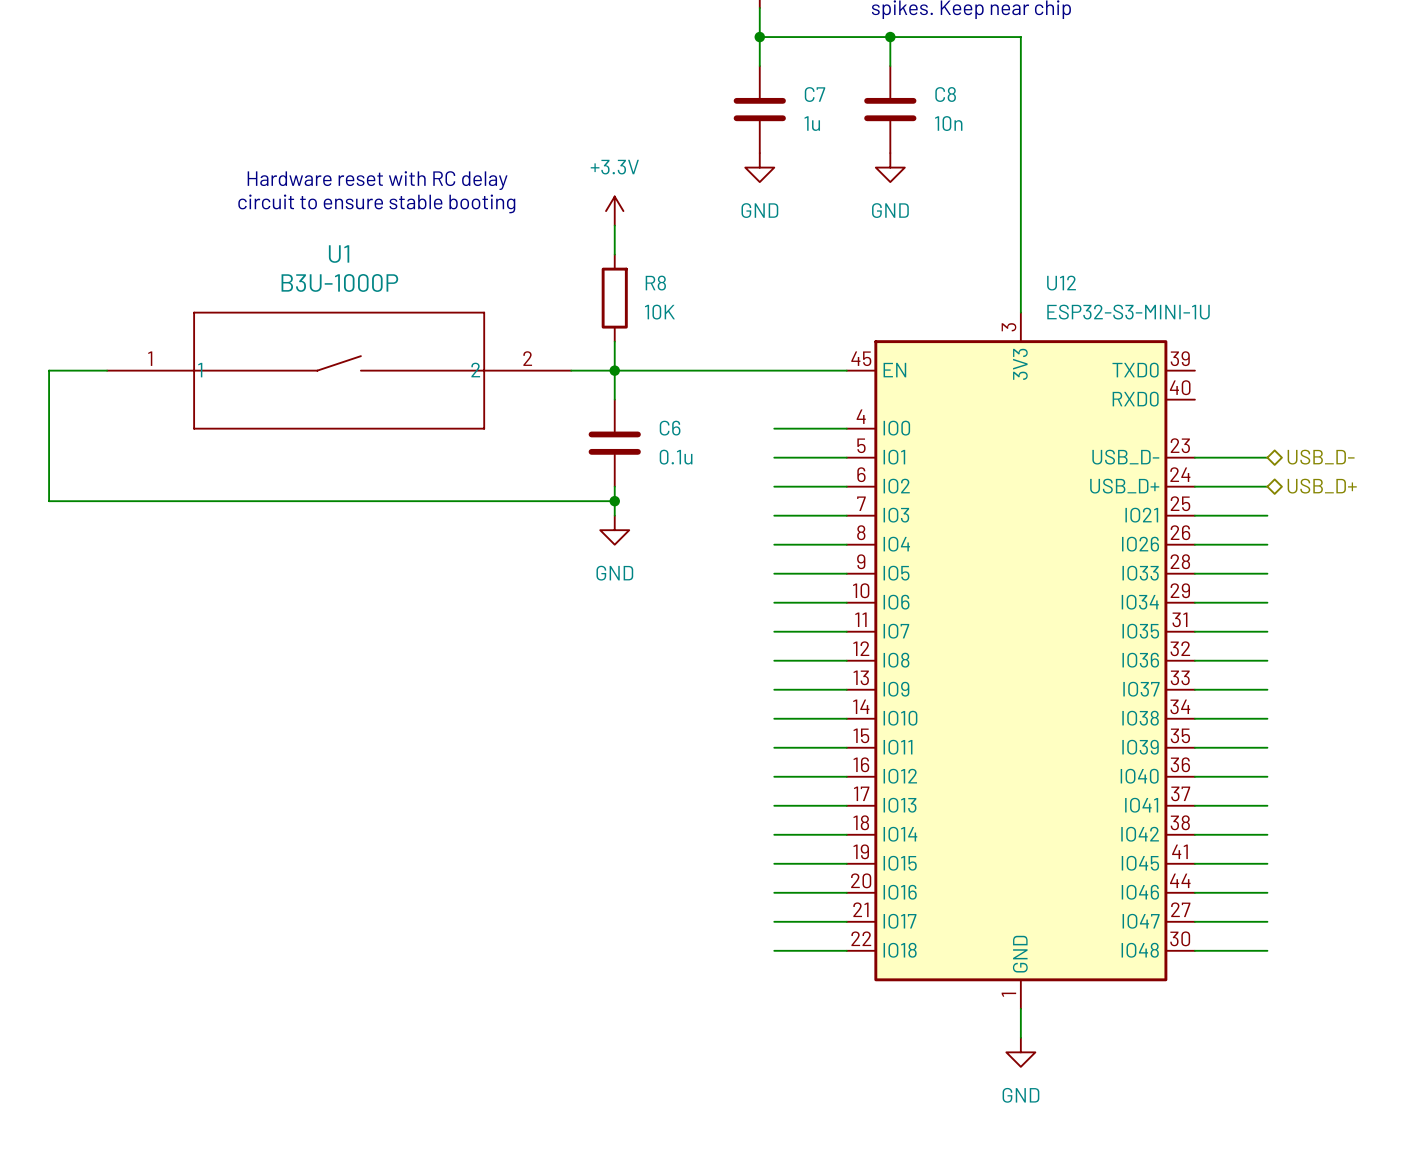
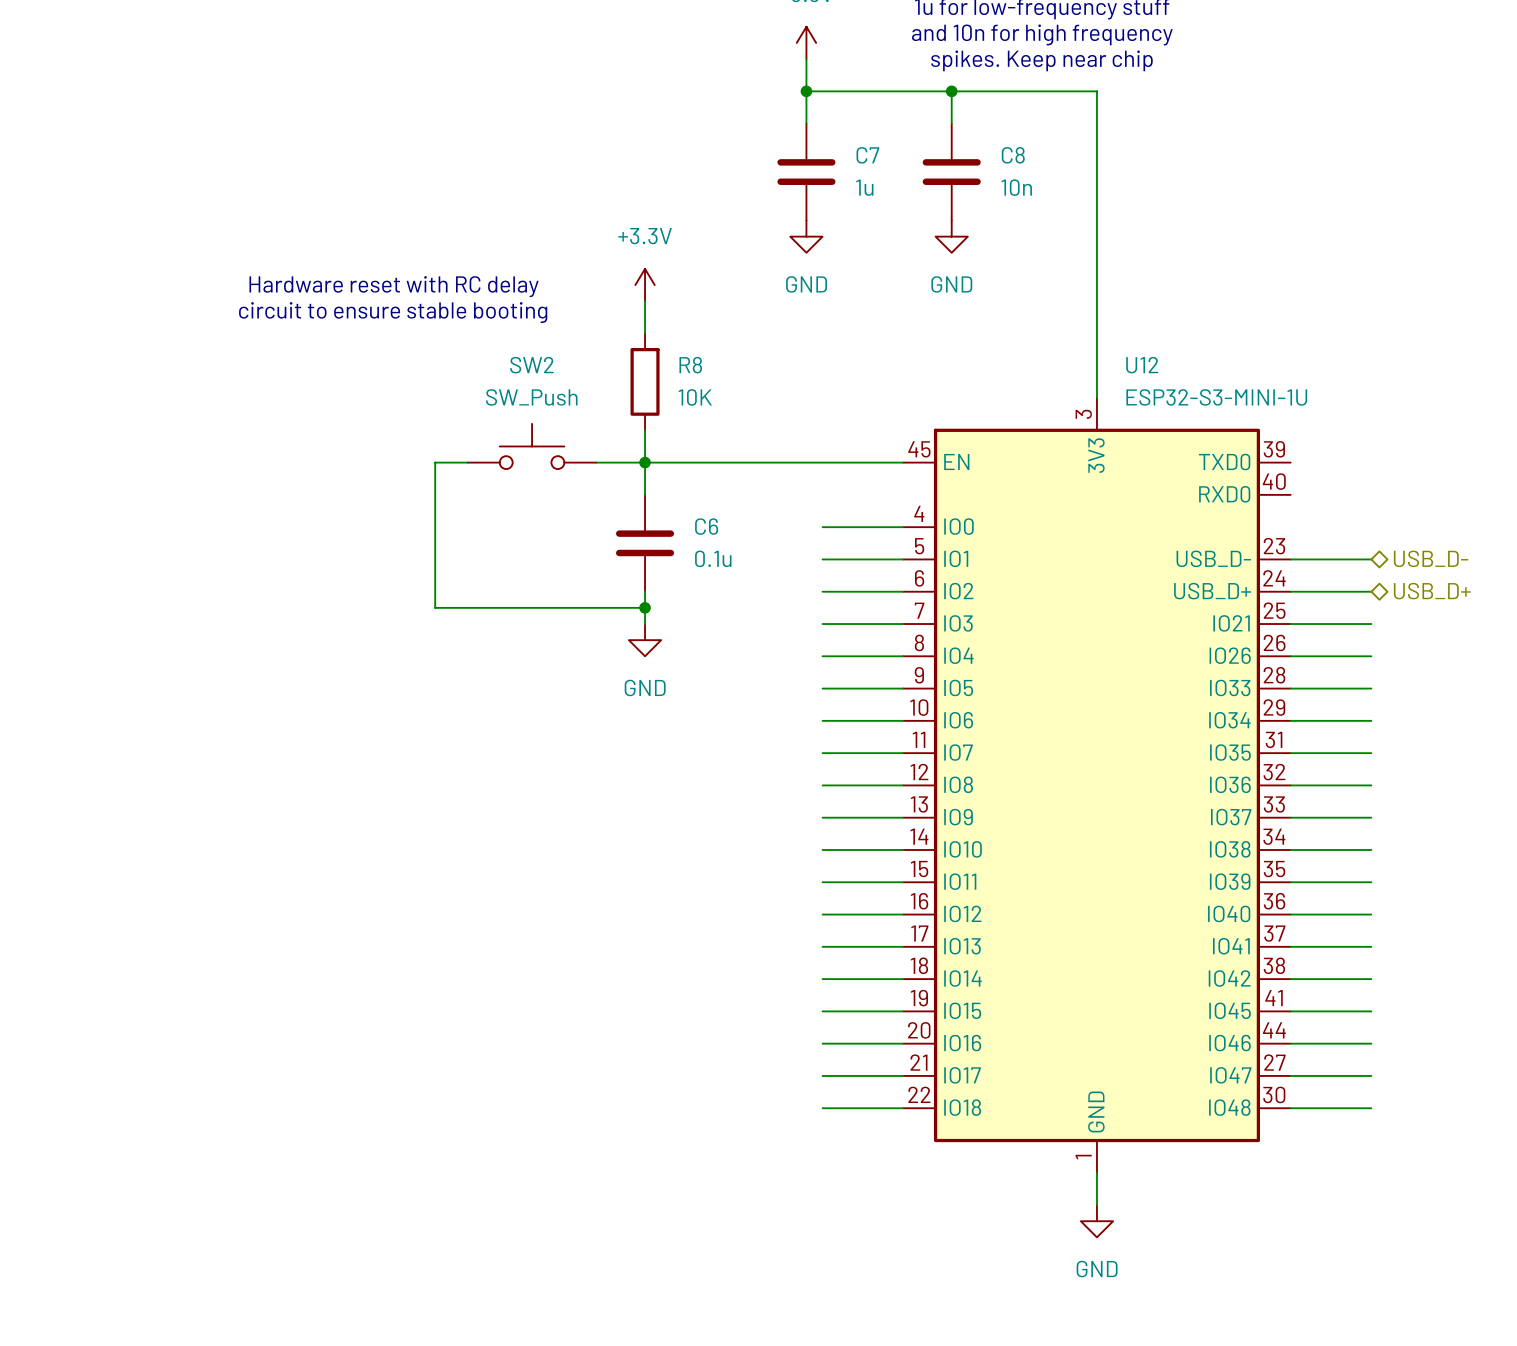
text position: Hardware reset with RC delay (377, 180) -> Hardware reset with RC delay (394, 286)
text position: circuit to ensure stable booting (376, 203) -> circuit to ensure stable booting (393, 312)
SW2: none -> SW_Push (532, 446)
wire: (107, 370) (49, 370) (49, 501) (426, 501) -> (467, 462) (435, 462) (435, 607)
U1: B3U-1000P (339, 370) -> none

